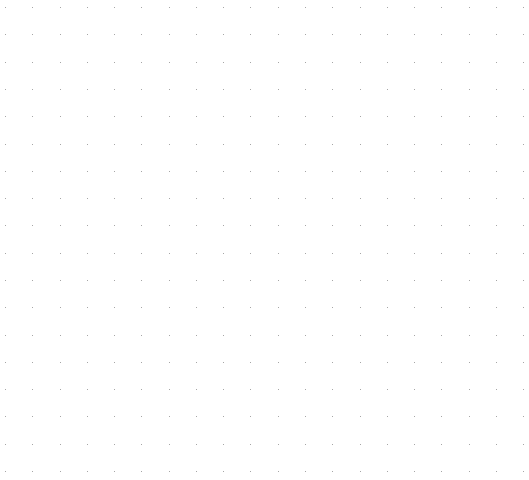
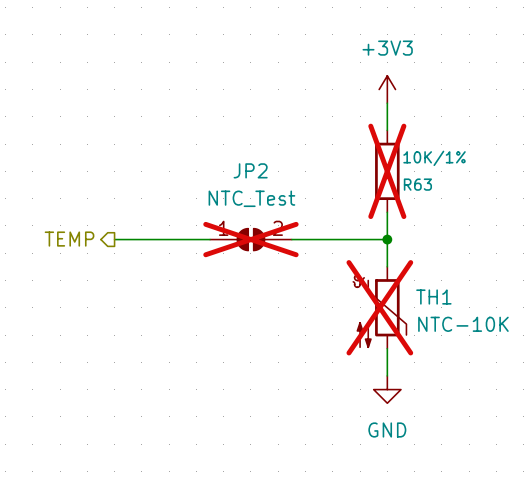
power symbol: none -> +3V3 (387, 89)
wire: none -> (387, 103) (387, 130)
R63: none -> 10K/1% (387, 171)
wire: none -> (387, 212) (387, 266)
hierarchical label: none -> TEMP (69, 239)
wire: none -> (114, 239) (210, 239)
JP2: none -> NTC_Test (250, 239)
wire: none -> (291, 239) (387, 239)
junction: none -> (387, 239)
TH1: none -> NTC-10K (379, 307)
wire: none -> (387, 348) (387, 375)
power symbol: none -> GND (387, 389)

